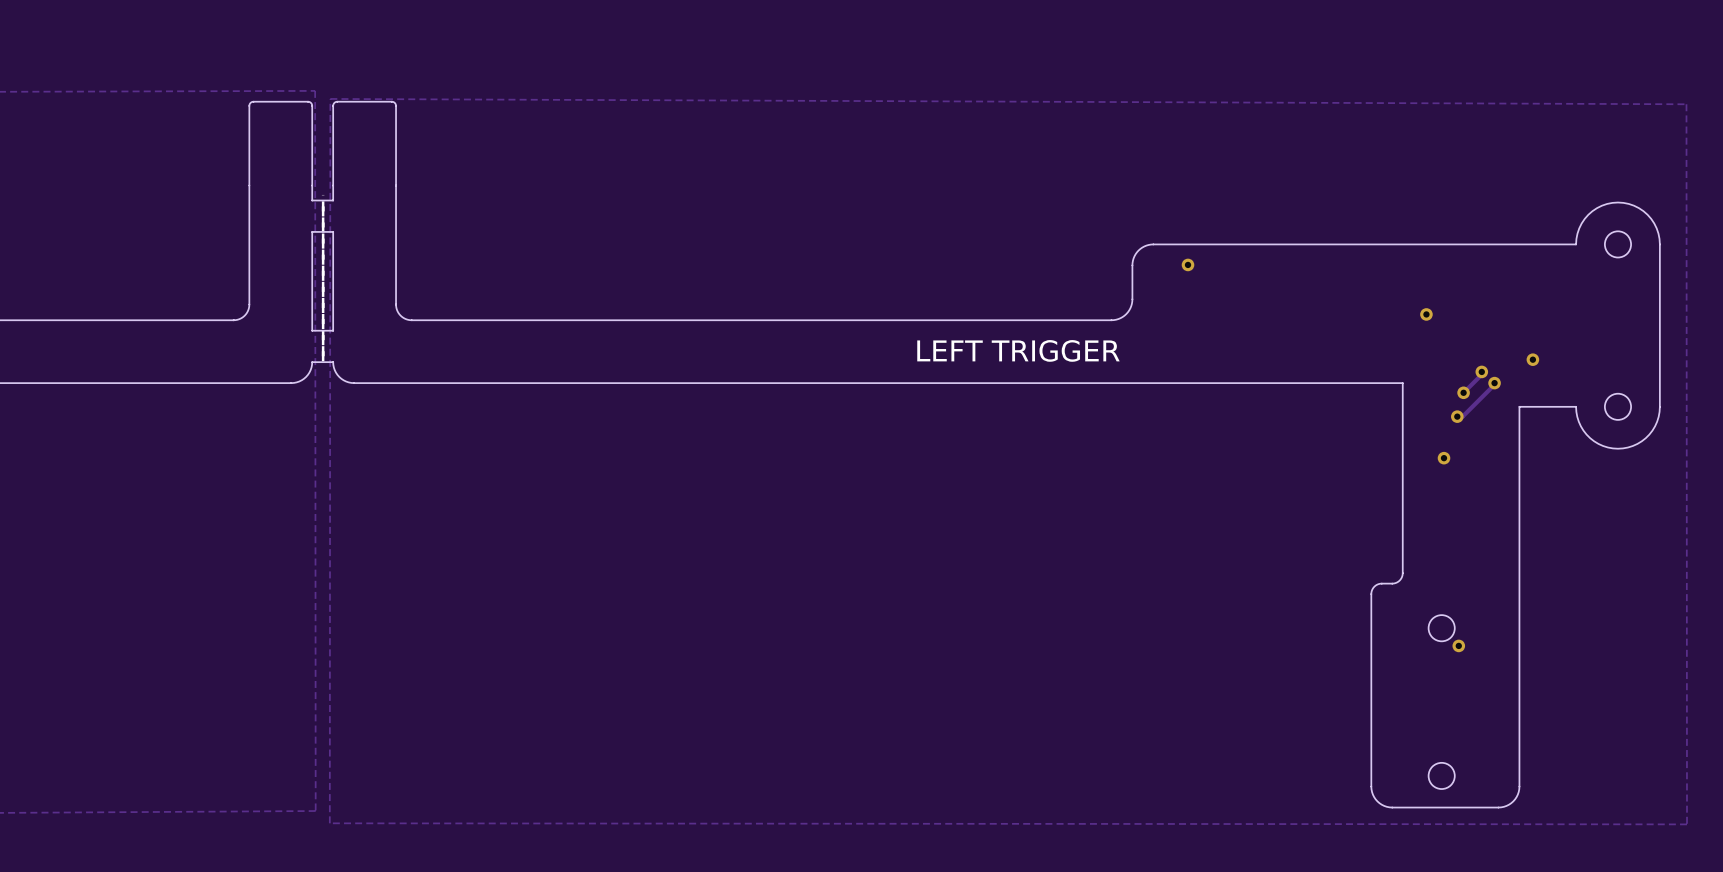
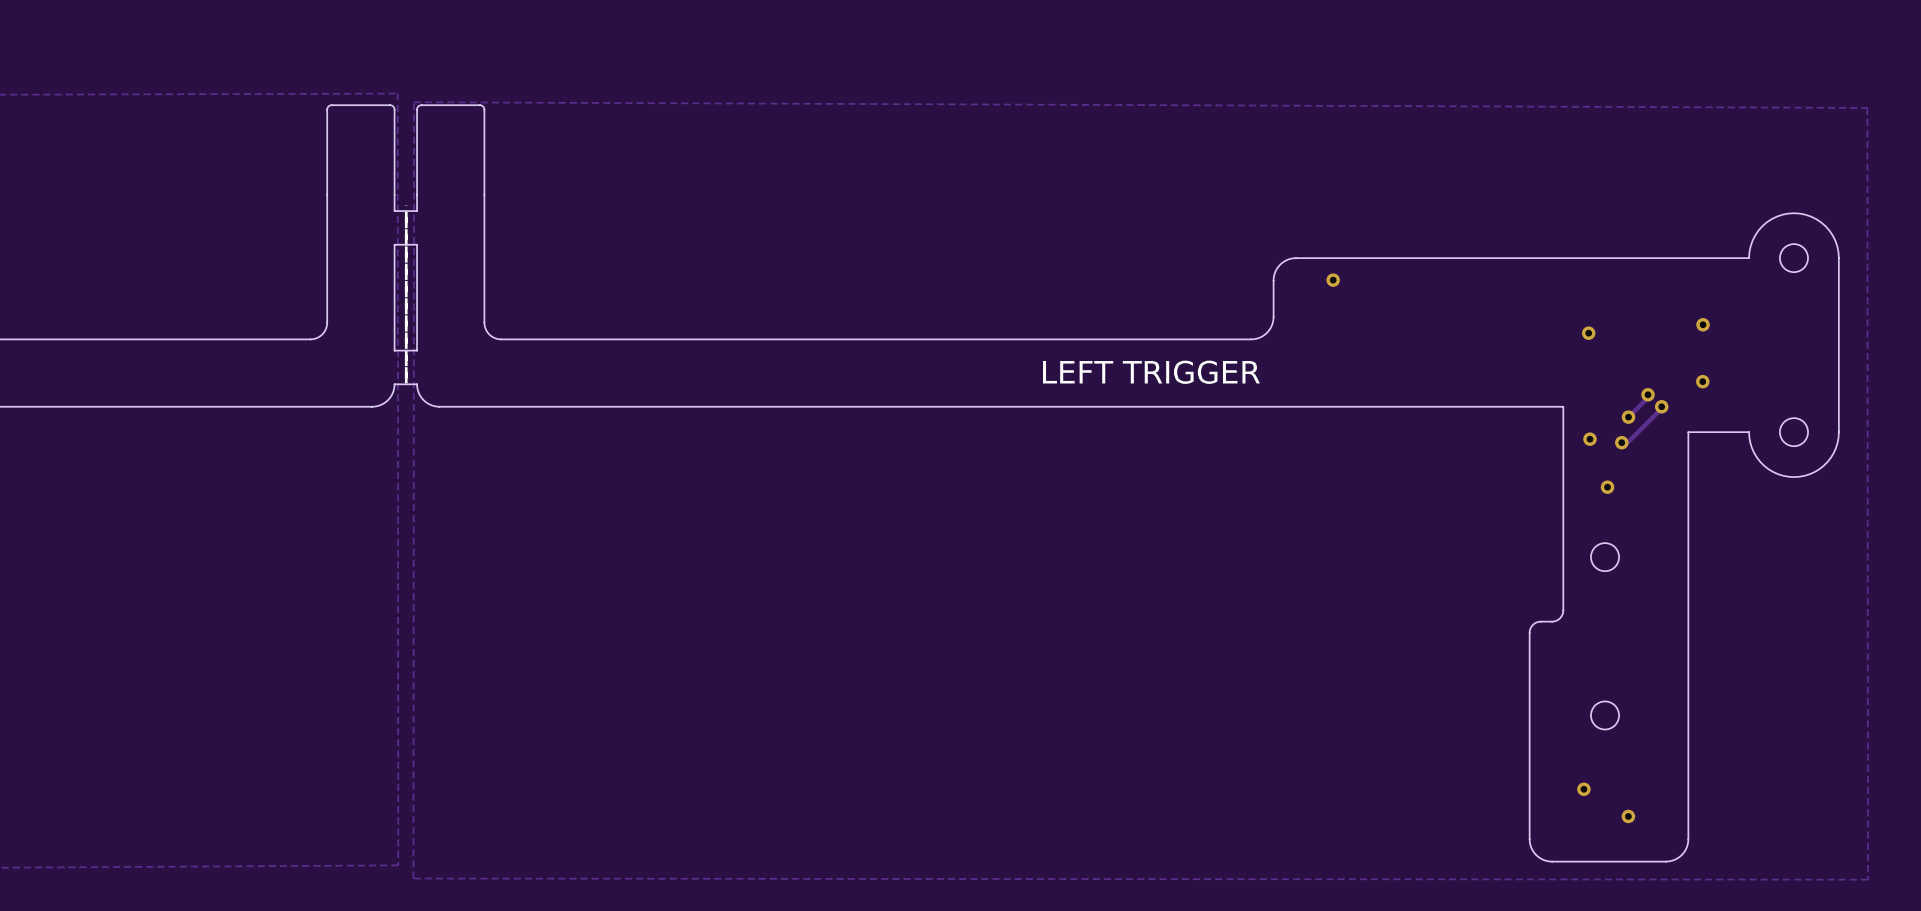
via: none -> (1703, 324)
via: none -> (1589, 439)
round board edge: none -> [1590, 542, 1620, 572]
round board edge position: (1441, 628) -> (1605, 715)
via: (1458, 645) -> none
via: none -> (1583, 789)
round board edge: [1428, 762, 1456, 790] -> none
via: none -> (1628, 816)

